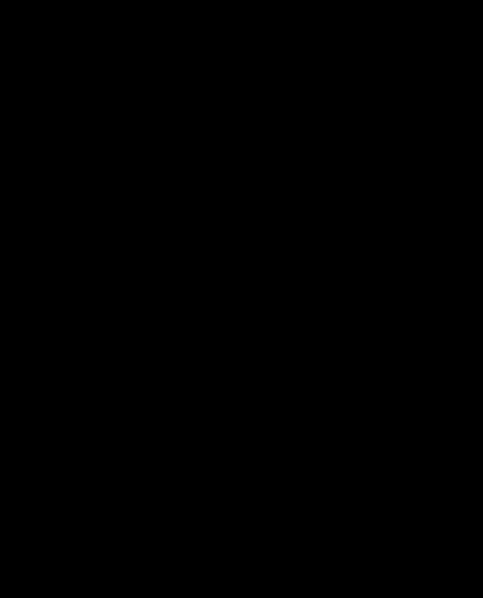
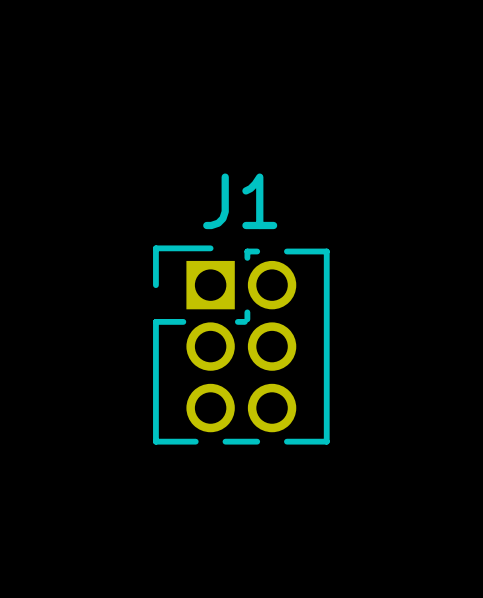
J1: none -> (241, 345)

